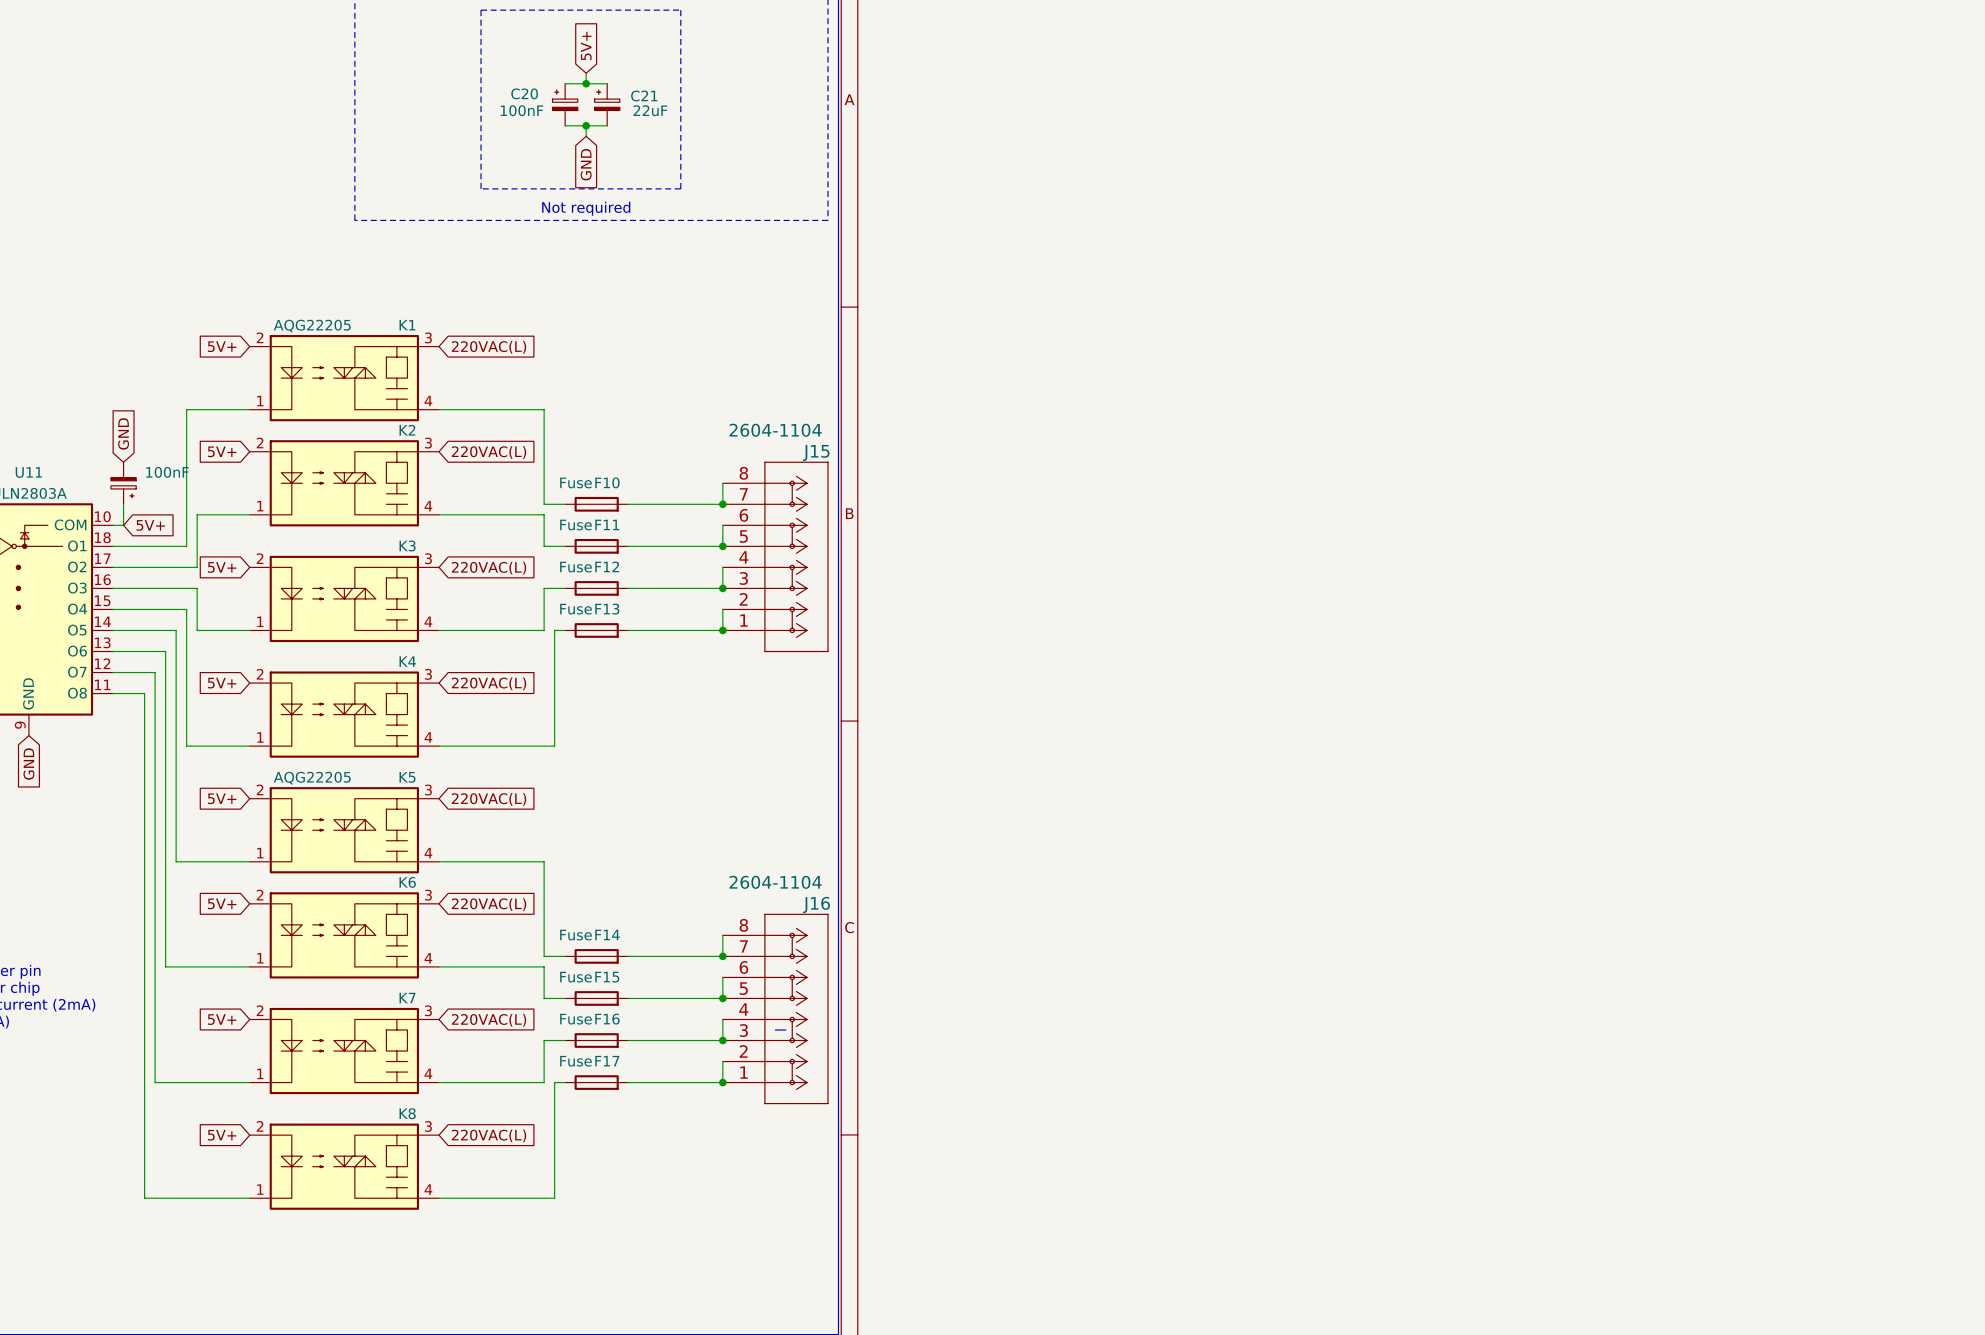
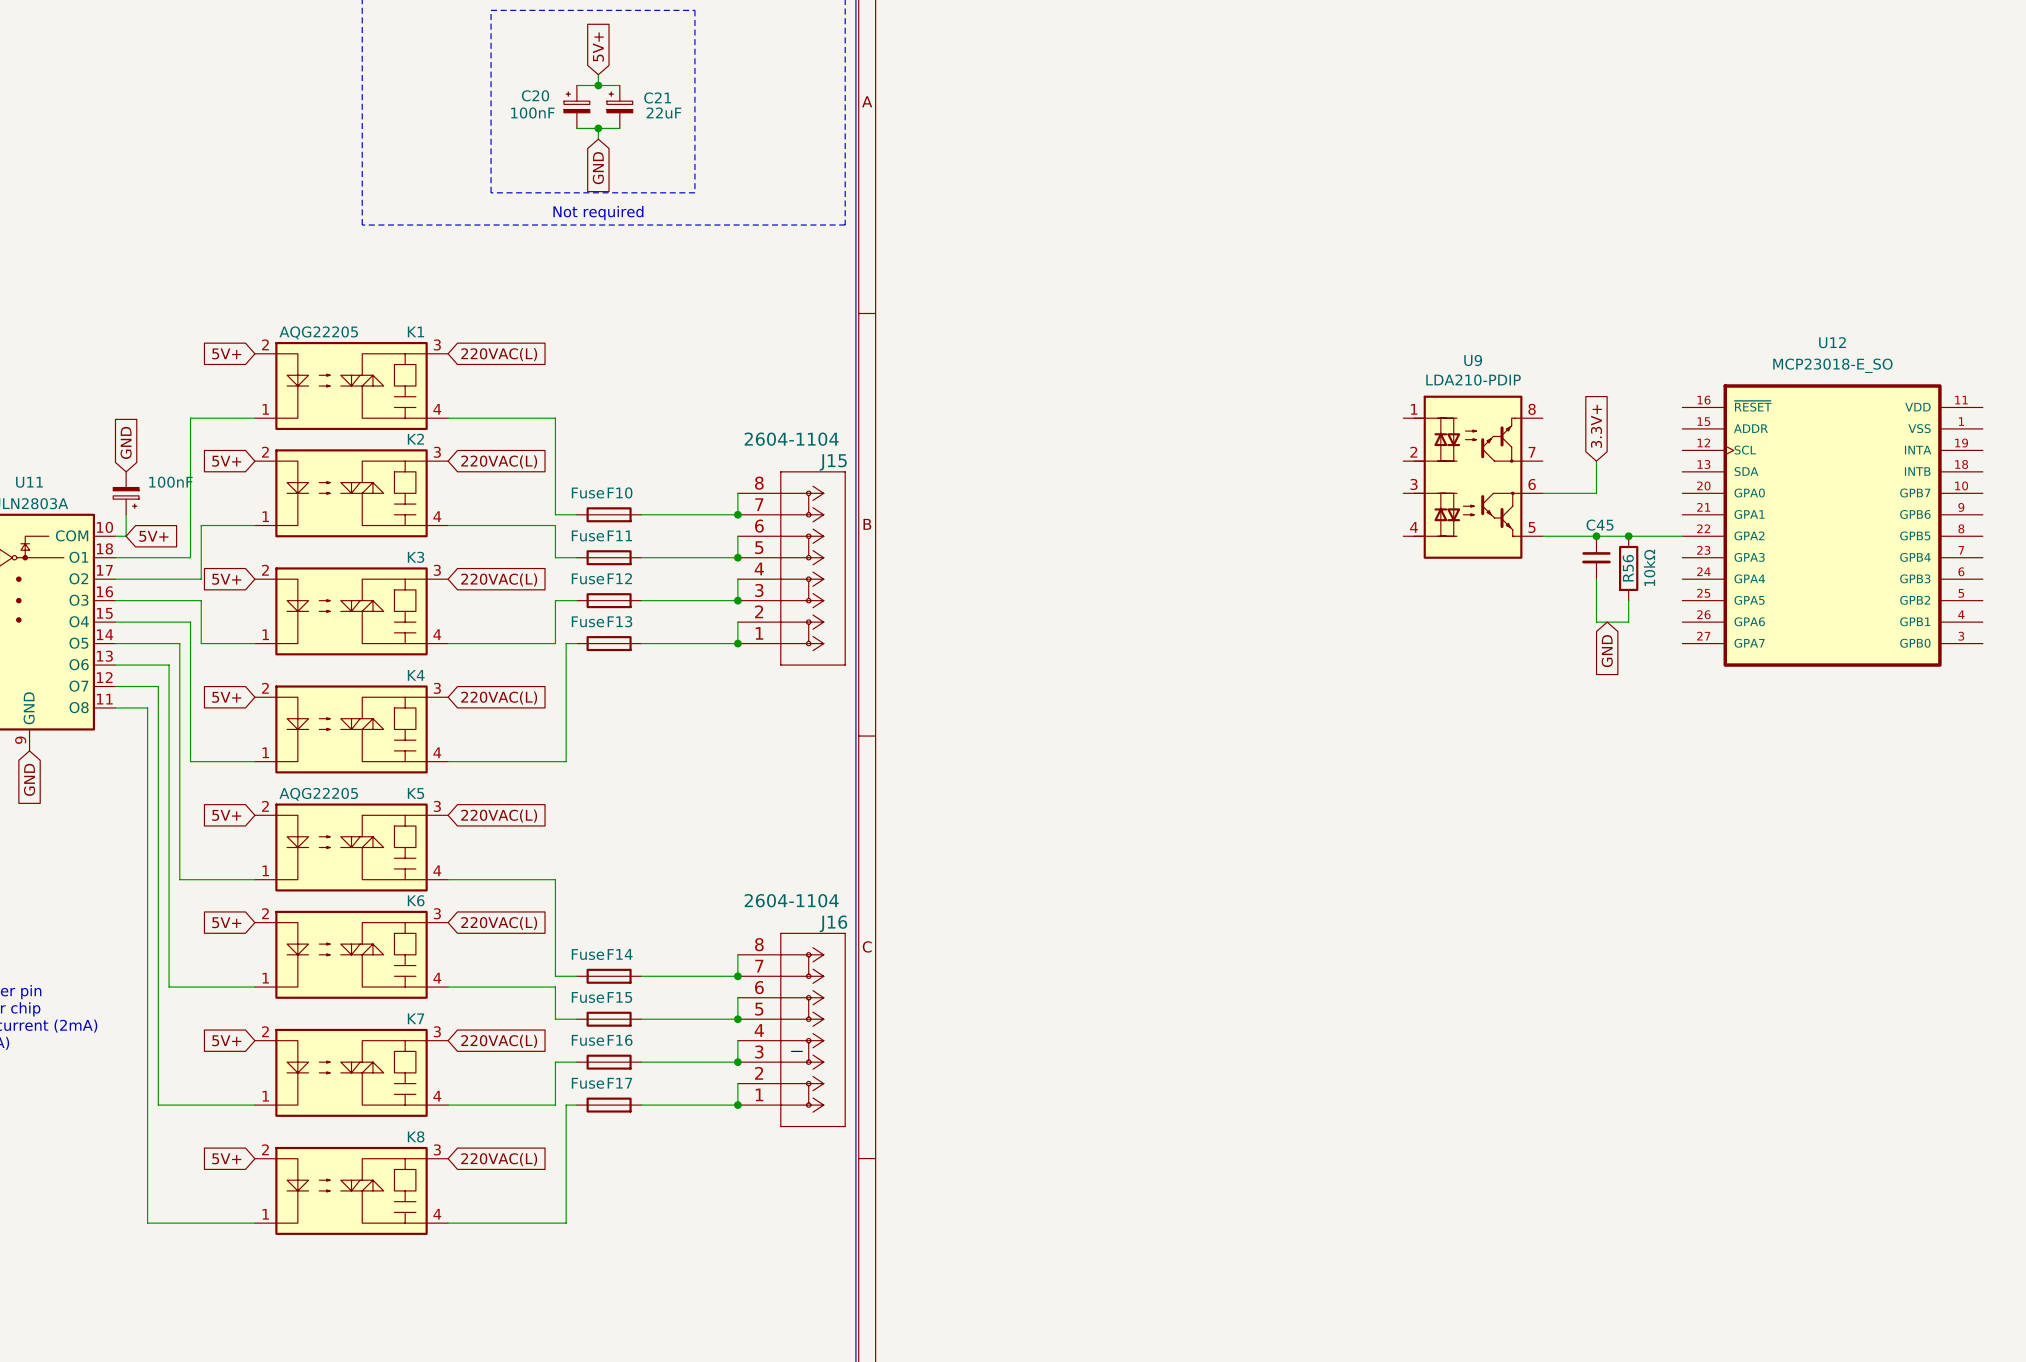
global label: none -> 3.3V+ (1596, 426)
wire: none -> (1596, 461) (1596, 493) (1542, 493)
U9: none -> LDA210-PDIP (1473, 477)
U12: none -> MCP23018-E_SO (1832, 525)
wire: none -> (1542, 536) (1682, 536)
junction: none -> (1596, 536)
junction: none -> (1628, 536)
C45: none -> (1596, 557)
R56: none -> 10kΩ (1628, 568)
wire: none -> (1596, 579) (1596, 622) (1628, 622) (1628, 600)
global label: none -> GND (1607, 651)

